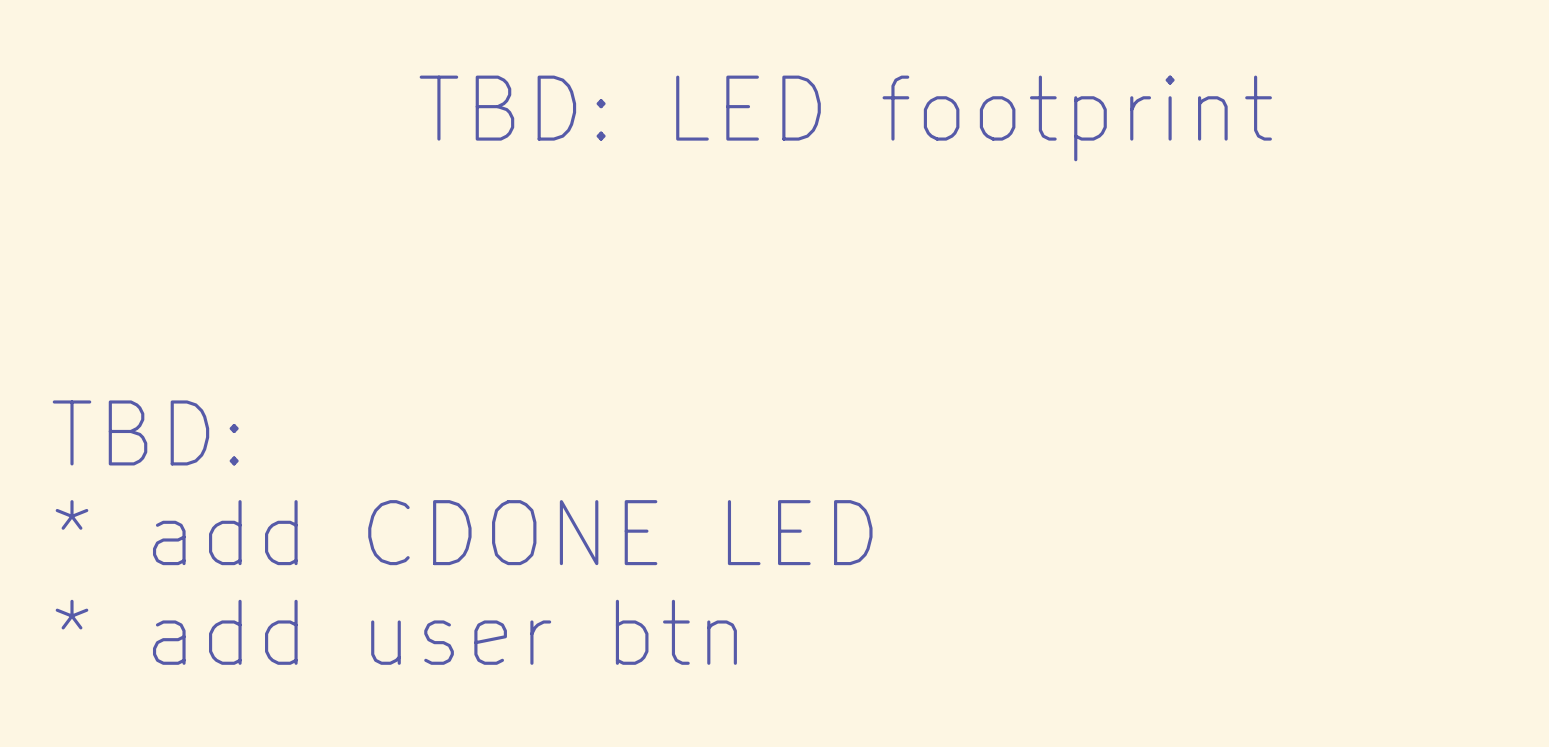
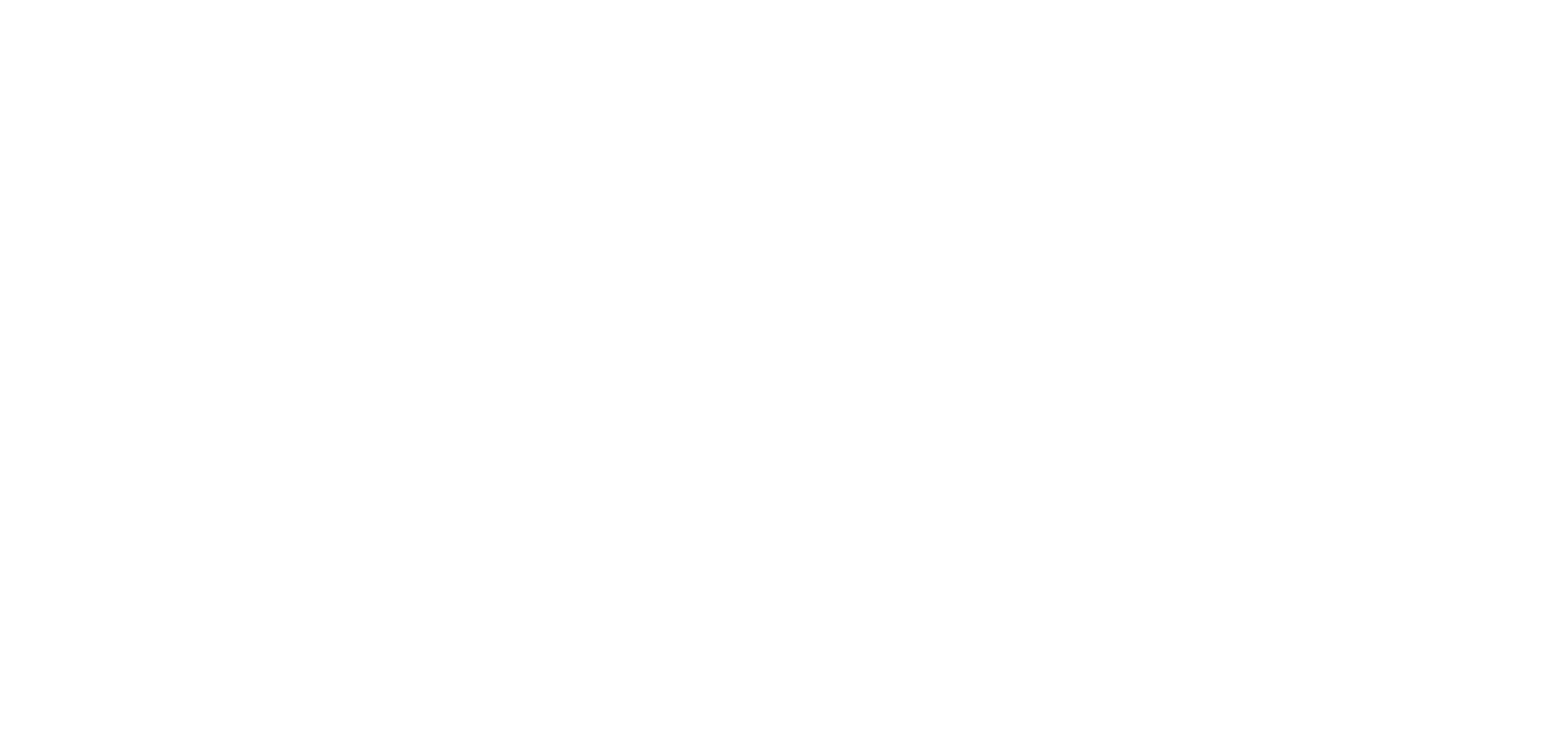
text: TBD: LED footprint (845, 118) -> none
text: TBD: (145, 432) -> none
text: * add CDONE LED (464, 532) -> none
text: * add user btn (396, 632) -> none

